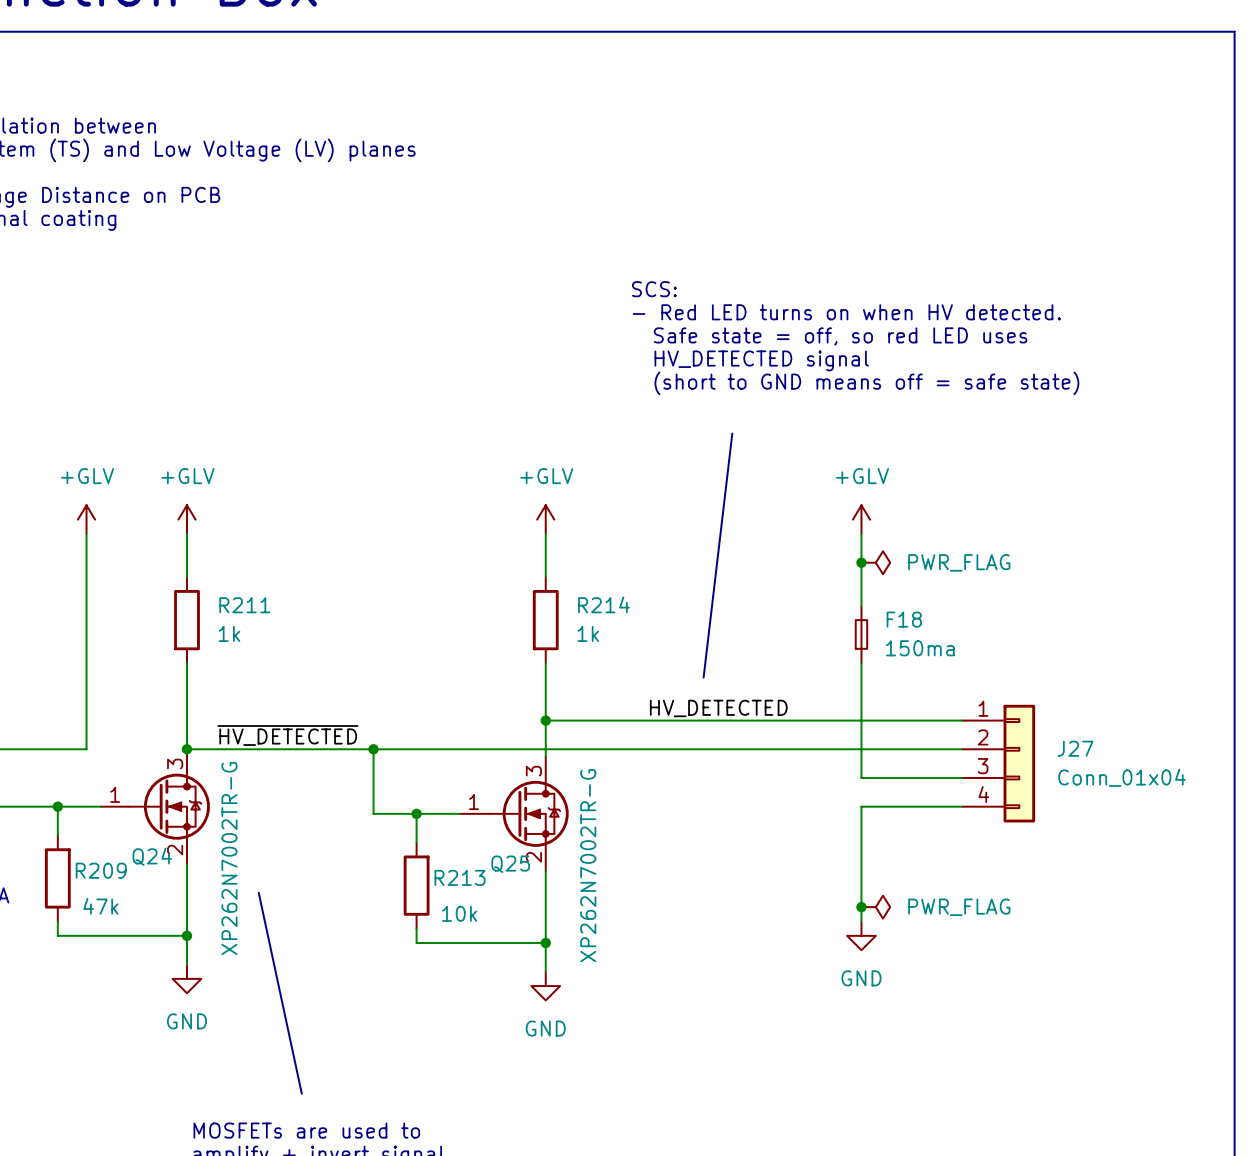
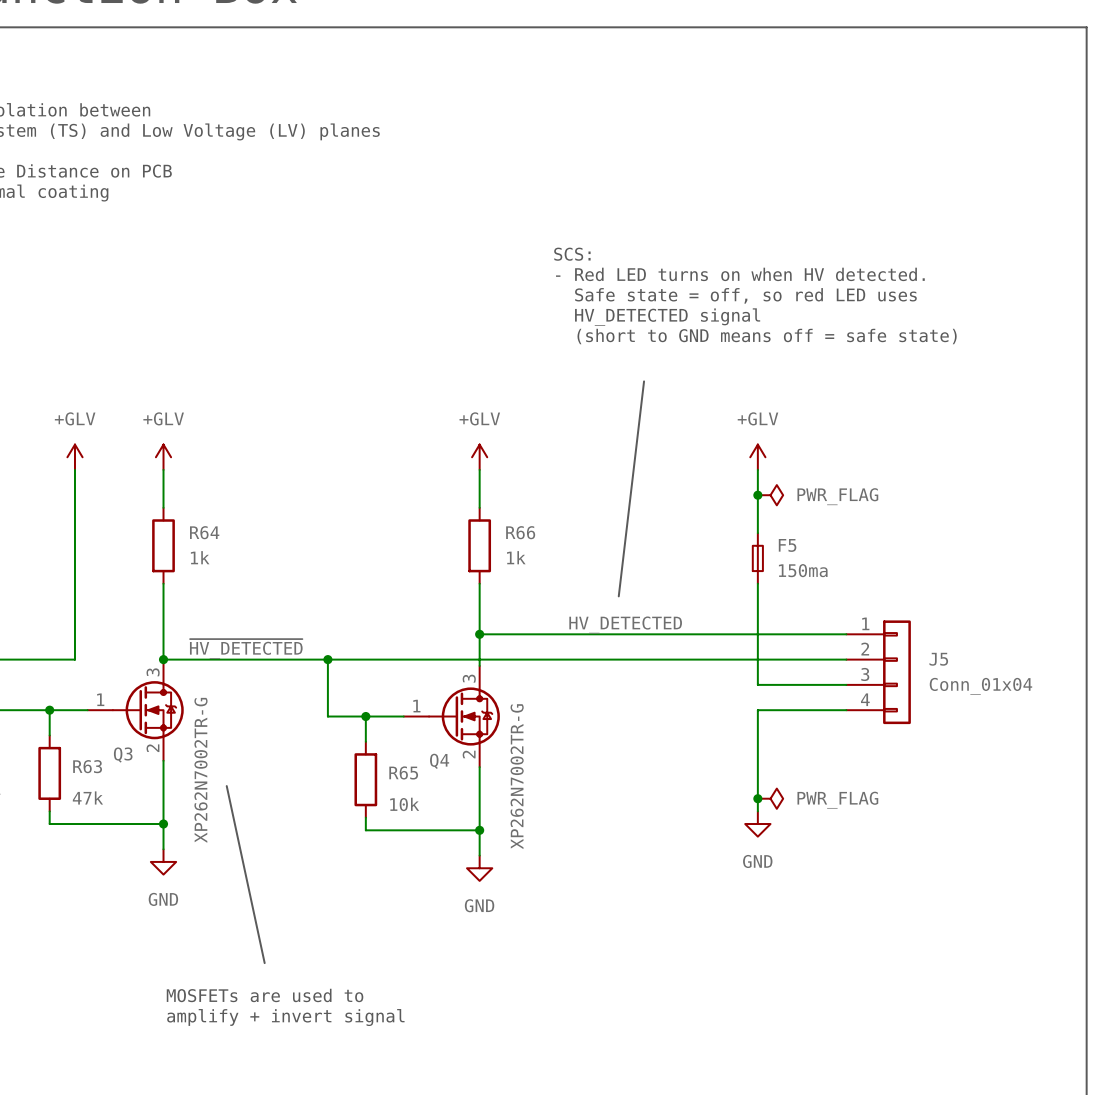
R214 name: R214 (603, 604) -> R66 (520, 532)
R211 name: R211 (244, 605) -> R64 (204, 532)
F18 name: F18 (904, 619) -> F5 (787, 545)
J27 name: J27 (1075, 748) -> J5 (938, 659)
Q24 name: Q24 (152, 856) -> Q3 (123, 755)
Q25 name: Q25 (510, 864) -> Q4 (439, 761)
R209 name: R209 (101, 870) -> R63 (87, 766)
R213 name: R213 (459, 877) -> R65 (403, 772)

